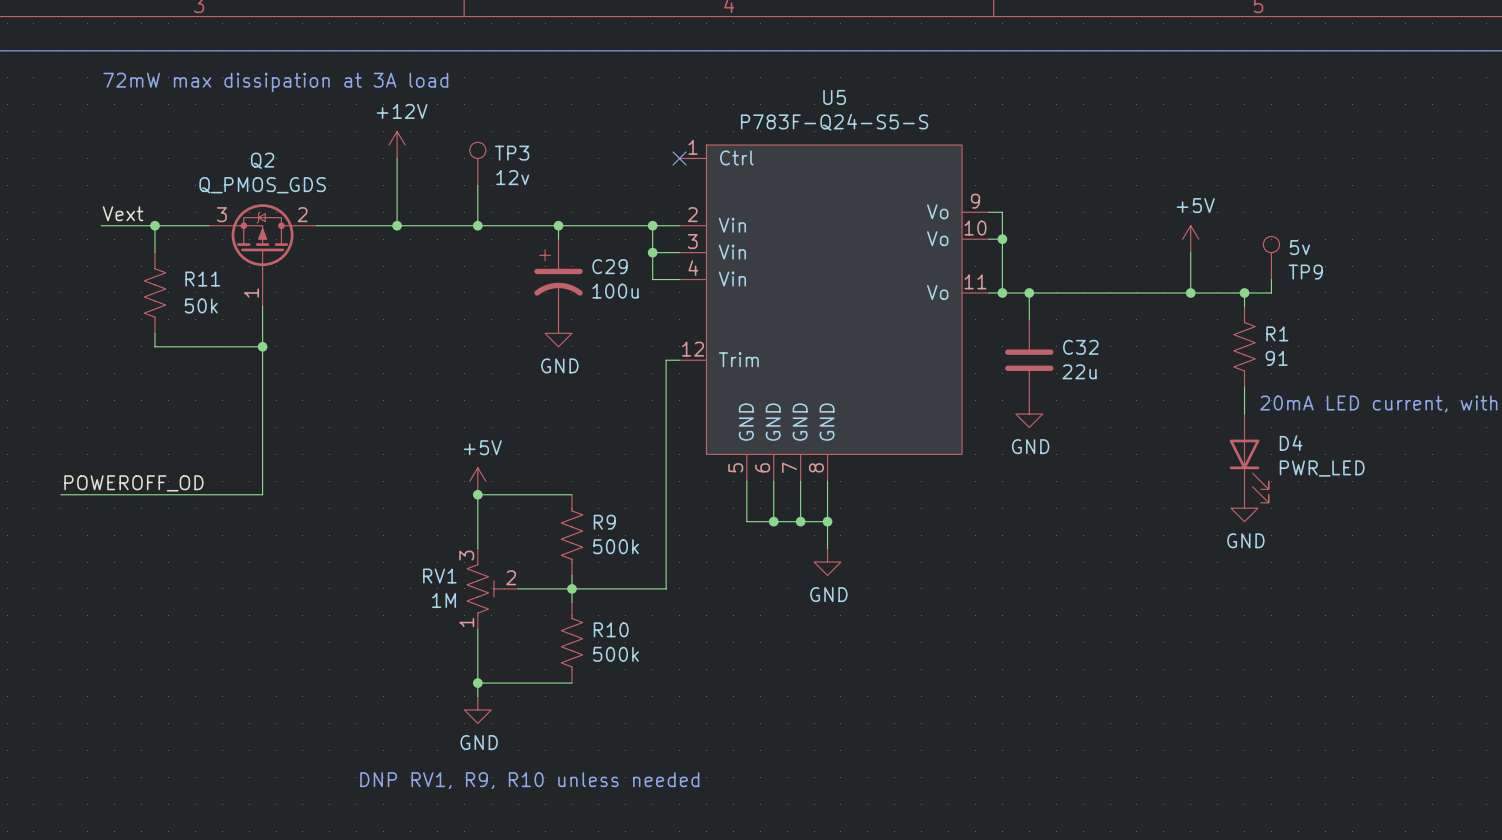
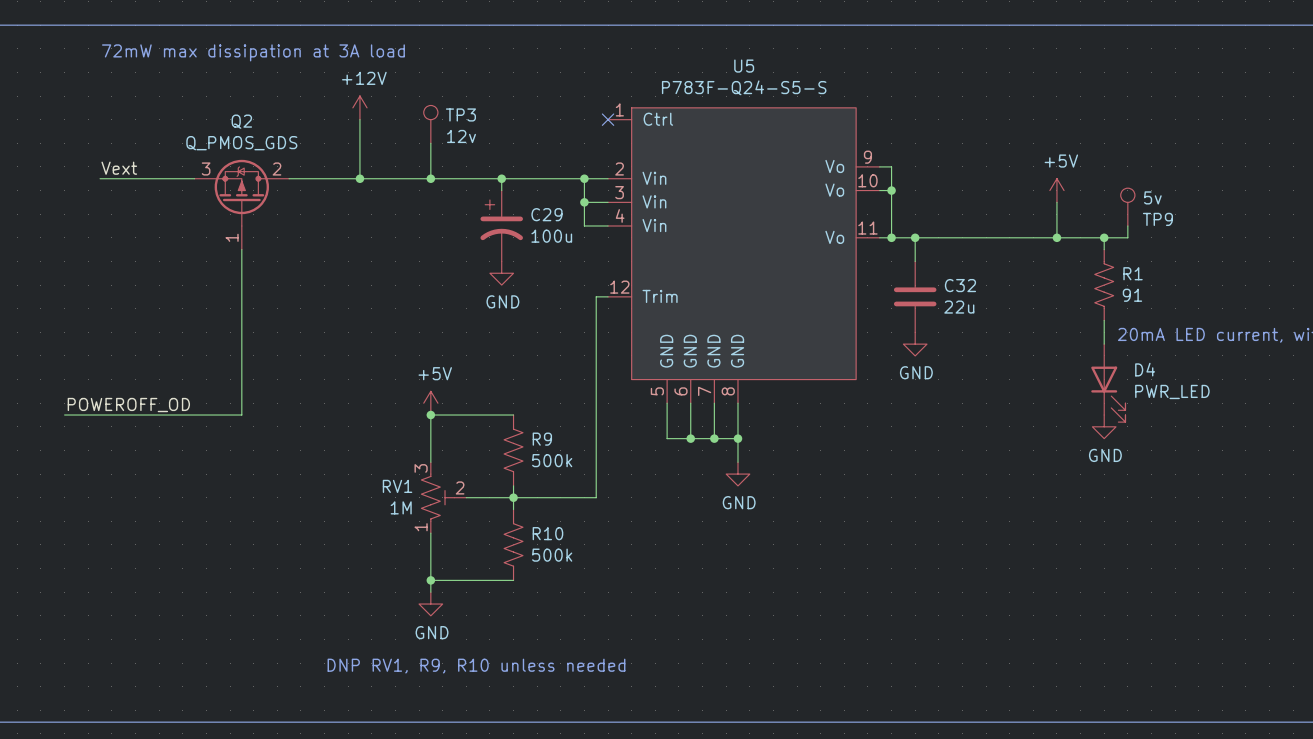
wire: (154, 225) (154, 252) -> none
junction: (154, 225) -> none
R11: 50k (154, 292) -> none
wire: (154, 333) (154, 346) (262, 346) -> none
junction: (262, 346) -> none

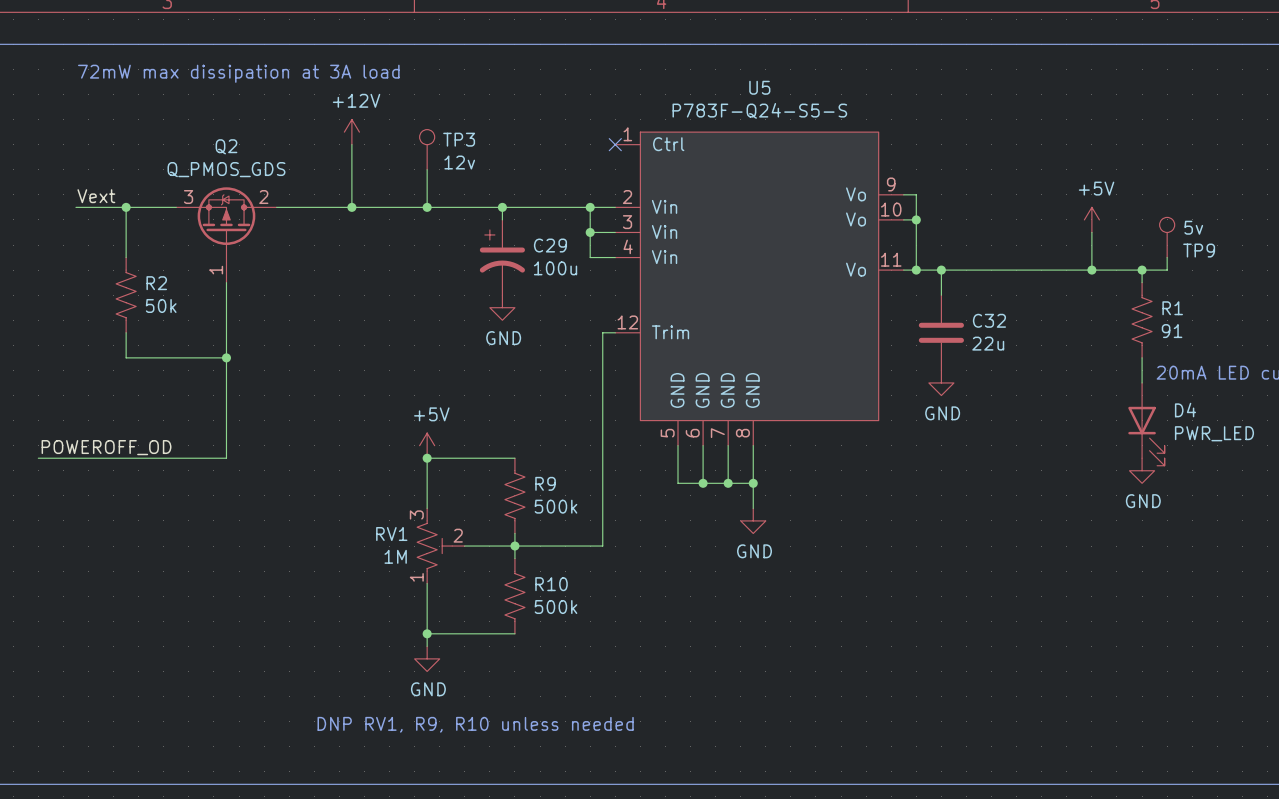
wire: none -> (126, 207) (126, 257)
junction: none -> (126, 207)
R2: none -> 50k (126, 295)
wire: none -> (126, 332) (126, 357) (226, 357)
junction: none -> (226, 357)

